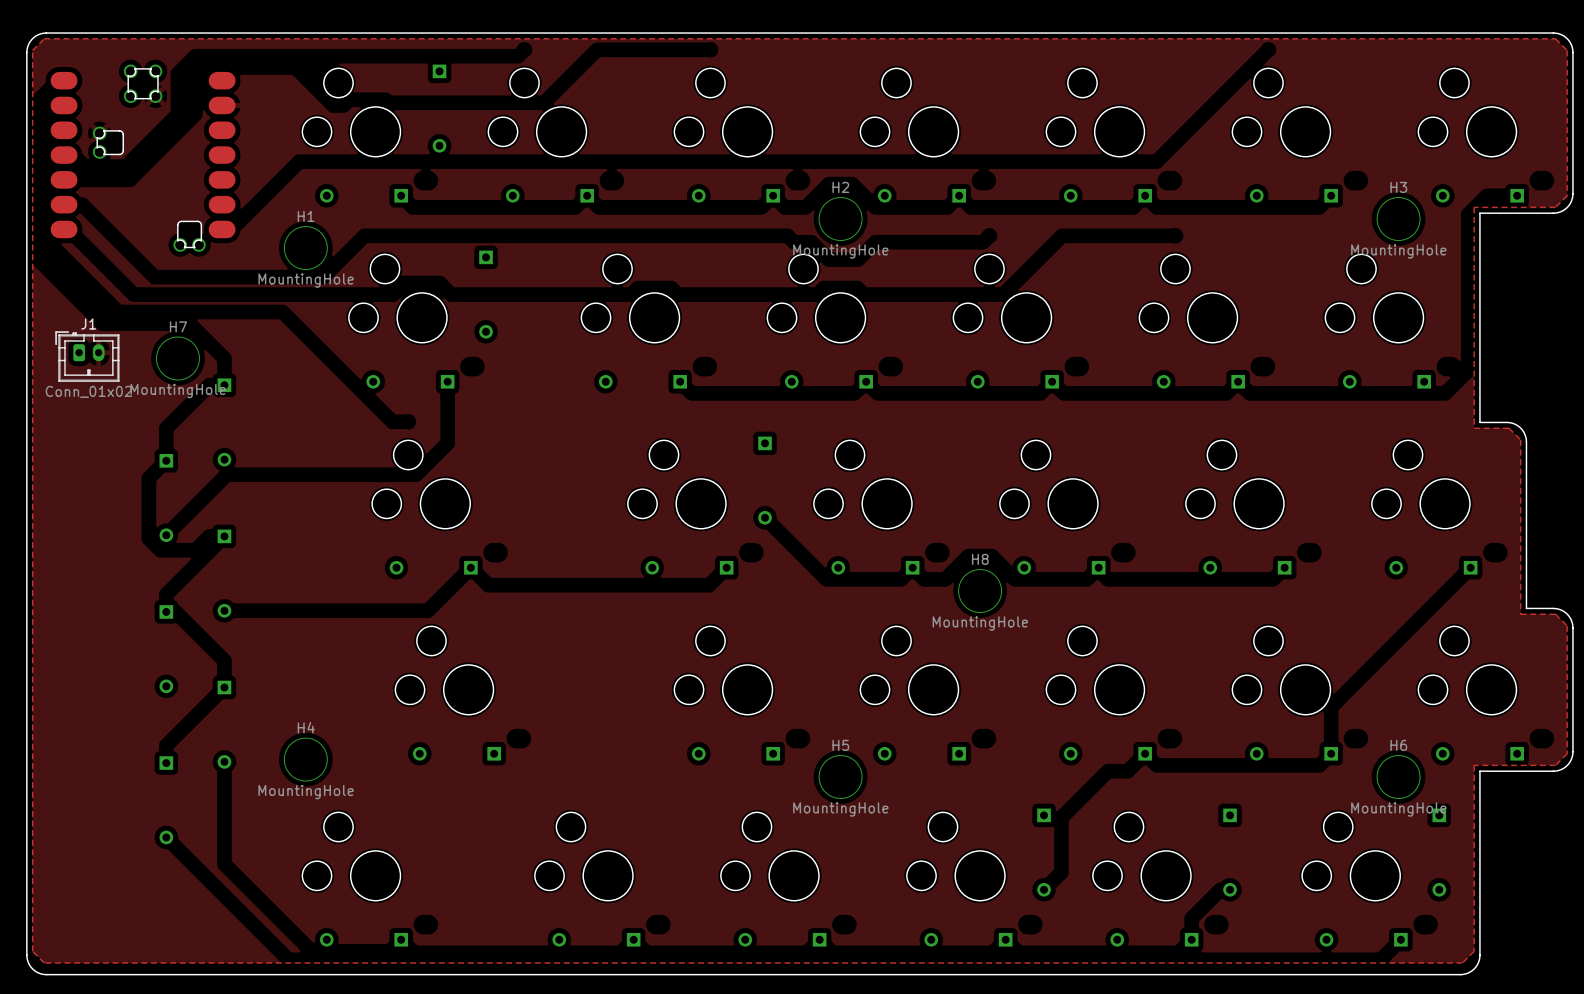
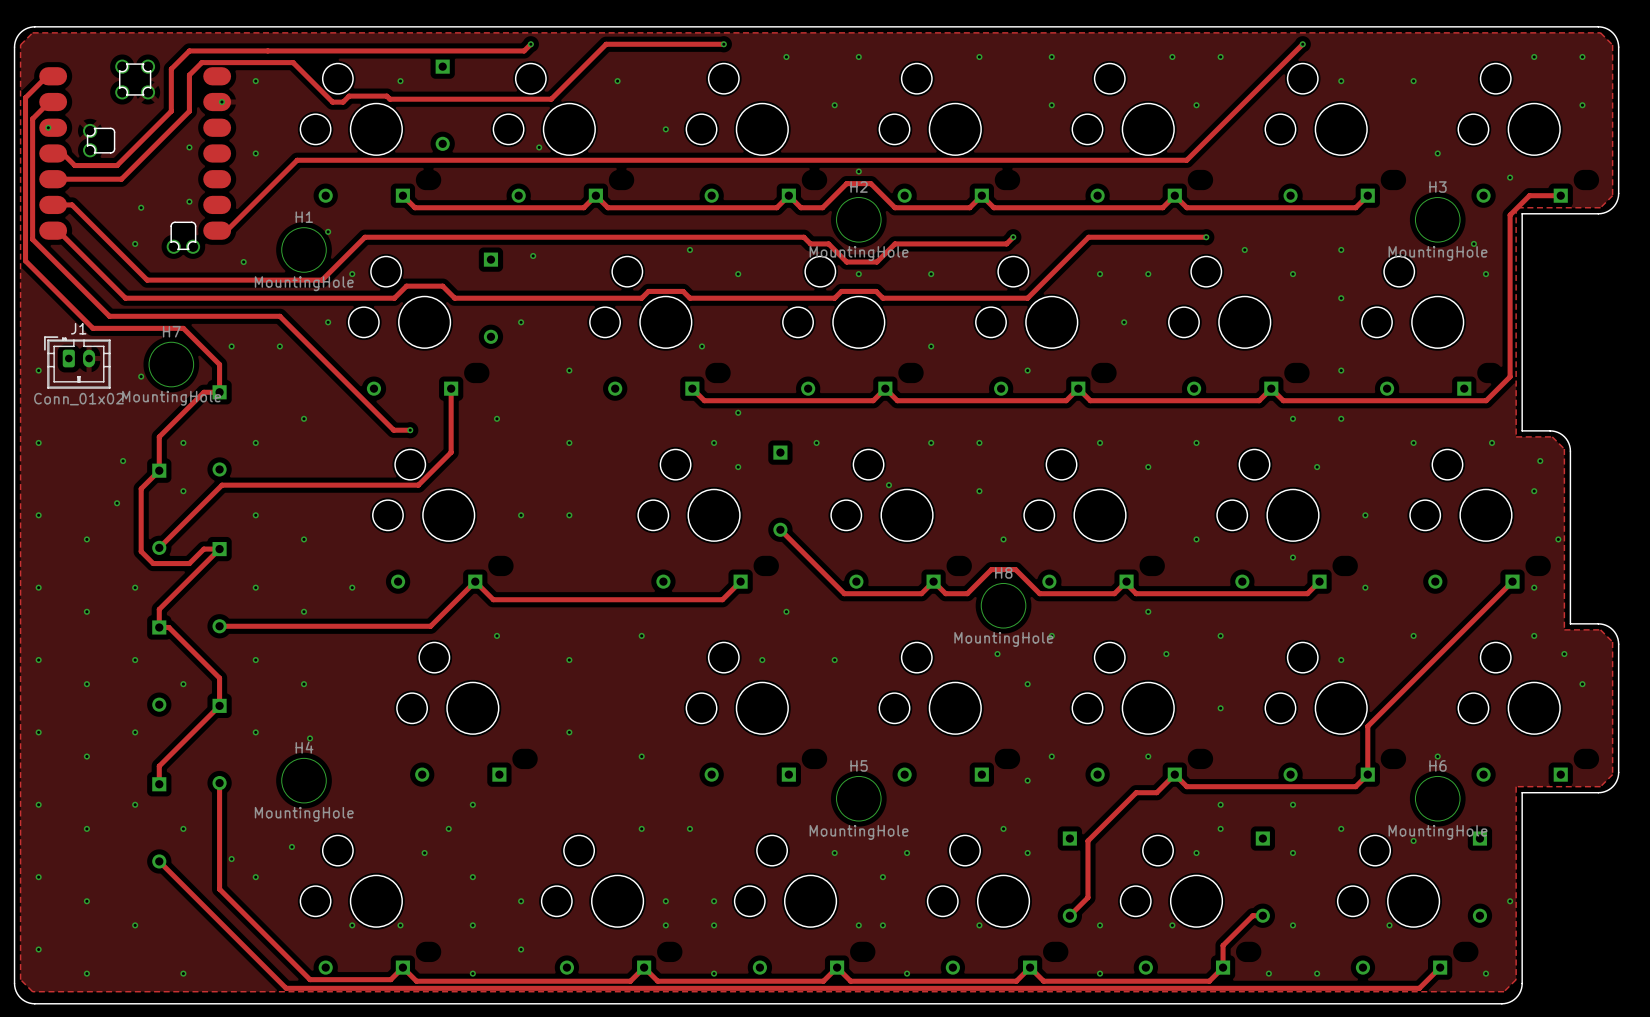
track: none -> (530, 44) (524, 50) (189, 50) (171, 69) (171, 111) (117, 165) (74, 165) (62, 153) (48, 153)
via: none -> (530, 44)
track: none -> (723, 44) (606, 44) (551, 99) (389, 99) (386, 96) (349, 96) (343, 102) (332, 102) (293, 62) (201, 62) (189, 75) (189, 111) (121, 179) (48, 179)
via: none -> (723, 44)
track: none -> (1302, 44) (1186, 160) (297, 160) (226, 230) (220, 230)
via: none -> (1302, 44)
via: none -> (786, 56)
via: none -> (858, 56)
via: none -> (979, 56)
via: none -> (1051, 56)
via: none -> (1172, 56)
via: none -> (1220, 56)
via: none -> (1534, 56)
via: none -> (1582, 56)
track: none -> (57, 76) (47, 76) (25, 97) (25, 260) (92, 328) (183, 328) (219, 364) (219, 392) (203, 392) (159, 436) (159, 470) (141, 488) (141, 551) (153, 563) (189, 563) (203, 549) (219, 549) (159, 609) (159, 627) (168, 627) (219, 678) (219, 705) (159, 766) (159, 784)
via: none -> (255, 81)
via: none -> (400, 81)
via: none -> (617, 81)
via: none -> (1341, 81)
via: none -> (1413, 81)
track: none -> (49, 102) (32, 118) (32, 239) (109, 316) (279, 316) (393, 430) (410, 430)
via: none -> (221, 102)
via: none -> (834, 105)
via: none -> (1051, 105)
via: none -> (1196, 105)
via: none -> (1582, 105)
via: none -> (48, 127)
via: none -> (665, 129)
via: none -> (189, 147)
via: none -> (539, 147)
via: none -> (255, 153)
via: none -> (1437, 153)
via: none -> (858, 171)
via: none -> (1510, 177)
track: none -> (402, 195) (414, 207) (583, 207) (595, 195) (607, 207) (776, 207) (788, 195) (800, 207) (822, 207) (846, 183) (870, 183) (894, 207) (969, 207) (981, 195) (993, 207) (1162, 207) (1174, 195) (1186, 207) (1355, 207) (1367, 195)
track: none -> (1560, 195) (1529, 195) (1510, 215) (1510, 376) (1486, 400) (1283, 400) (1271, 388) (1259, 400) (1090, 400) (1078, 388) (1066, 400) (897, 400) (885, 388) (873, 400) (704, 400) (692, 388)
via: none -> (189, 201)
track: none -> (57, 204) (72, 204) (147, 280) (322, 280) (364, 237) (803, 237) (810, 243) (828, 243) (846, 262) (876, 262) (894, 243) (1006, 243) (1013, 237)
via: none -> (141, 207)
track: none -> (57, 230) (125, 298) (394, 298) (406, 286) (442, 286) (454, 298) (641, 298) (648, 291) (683, 291) (689, 298) (834, 298) (841, 291) (876, 291) (882, 298) (1027, 298) (1088, 237) (1206, 237)
via: none -> (328, 231)
via: none -> (1013, 237)
via: none -> (1206, 237)
via: none -> (135, 243)
via: none -> (1473, 243)
via: none -> (689, 249)
via: none -> (1244, 249)
via: none -> (1341, 249)
via: none -> (533, 256)
via: none -> (243, 262)
via: none -> (352, 274)
via: none -> (738, 274)
via: none -> (858, 274)
via: none -> (931, 274)
via: none -> (1100, 274)
via: none -> (1148, 274)
via: none -> (1293, 274)
via: none -> (1485, 274)
via: none -> (1341, 298)
via: none -> (328, 322)
via: none -> (521, 322)
via: none -> (1124, 322)
via: none -> (231, 346)
via: none -> (279, 346)
via: none -> (702, 346)
via: none -> (931, 346)
via: none -> (38, 370)
via: none -> (569, 370)
via: none -> (1027, 370)
via: none -> (1341, 370)
via: none -> (141, 376)
track: none -> (451, 388) (451, 452) (418, 485) (221, 485) (159, 547)
via: none -> (738, 412)
via: none -> (304, 418)
via: none -> (496, 418)
via: none -> (1293, 418)
via: none -> (1341, 418)
via: none -> (410, 430)
via: none -> (38, 442)
via: none -> (183, 442)
via: none -> (255, 442)
via: none -> (569, 442)
via: none -> (714, 442)
via: none -> (816, 442)
via: none -> (931, 442)
via: none -> (979, 442)
via: none -> (1100, 442)
via: none -> (1196, 442)
via: none -> (1413, 442)
via: none -> (1492, 442)
via: none -> (123, 461)
via: none -> (1540, 461)
via: none -> (738, 467)
via: none -> (1148, 467)
via: none -> (1317, 467)
via: none -> (888, 485)
via: none -> (183, 491)
via: none -> (979, 491)
via: none -> (1534, 491)
via: none -> (117, 503)
via: none -> (38, 515)
via: none -> (255, 515)
via: none -> (521, 515)
via: none -> (569, 515)
via: none -> (1365, 515)
track: none -> (780, 529) (844, 593) (921, 593) (933, 581) (945, 593) (967, 593) (991, 569) (1015, 569) (1039, 593) (1114, 593) (1126, 581) (1126, 584) (1136, 593) (1307, 593) (1319, 581)
via: none -> (86, 539)
via: none -> (304, 539)
via: none -> (1003, 539)
via: none -> (1196, 539)
via: none -> (1558, 539)
via: none -> (1293, 557)
track: none -> (740, 581) (722, 599) (493, 599) (475, 581) (430, 626) (219, 626)
track: none -> (1510, 581) (1512, 581) (1367, 726) (1367, 774) (1355, 786) (1186, 786) (1174, 774) (1156, 792) (1136, 792) (1087, 840) (1087, 897) (1069, 915)
via: none -> (38, 587)
via: none -> (135, 587)
via: none -> (255, 587)
via: none -> (352, 587)
via: none -> (1365, 587)
via: none -> (1534, 587)
via: none -> (86, 611)
via: none -> (304, 611)
via: none -> (786, 611)
via: none -> (1148, 611)
via: none -> (496, 635)
via: none -> (641, 635)
via: none -> (1051, 635)
via: none -> (1220, 635)
via: none -> (1413, 635)
via: none -> (1534, 635)
via: none -> (997, 654)
via: none -> (1166, 654)
via: none -> (1564, 654)
via: none -> (38, 660)
via: none -> (135, 660)
via: none -> (255, 660)
via: none -> (569, 660)
via: none -> (762, 660)
via: none -> (834, 660)
via: none -> (1341, 660)
via: none -> (86, 684)
via: none -> (183, 684)
via: none -> (304, 684)
via: none -> (1027, 684)
via: none -> (1582, 684)
via: none -> (1220, 708)
via: none -> (38, 732)
via: none -> (135, 732)
via: none -> (255, 732)
via: none -> (569, 732)
via: none -> (310, 738)
via: none -> (86, 756)
via: none -> (641, 756)
via: none -> (1051, 756)
via: none -> (1148, 756)
via: none -> (1437, 756)
via: none -> (1027, 780)
track: none -> (219, 783) (219, 889) (310, 979) (390, 979) (402, 967) (416, 981) (630, 981) (644, 967) (657, 981) (823, 981) (837, 967) (850, 981) (1016, 981) (1030, 967)
via: none -> (38, 804)
via: none -> (135, 804)
via: none -> (472, 804)
via: none -> (1220, 804)
via: none -> (1293, 804)
via: none -> (86, 828)
via: none -> (183, 828)
via: none -> (448, 828)
via: none -> (641, 828)
via: none -> (689, 828)
via: none -> (1003, 828)
via: none -> (1220, 828)
via: none -> (1341, 828)
via: none -> (1413, 840)
via: none -> (291, 846)
via: none -> (424, 853)
via: none -> (834, 853)
via: none -> (907, 853)
via: none -> (1027, 853)
via: none -> (1196, 853)
via: none -> (1293, 853)
via: none -> (231, 859)
track: none -> (159, 861) (286, 988) (1419, 988) (1440, 967)
via: none -> (38, 877)
via: none -> (255, 877)
via: none -> (472, 877)
via: none -> (882, 877)
via: none -> (86, 901)
via: none -> (521, 901)
via: none -> (665, 901)
via: none -> (714, 901)
via: none -> (1510, 901)
track: none -> (1262, 915) (1252, 915) (1223, 945) (1223, 967) (1209, 981) (1043, 981) (1030, 967)
via: none -> (135, 925)
via: none -> (352, 925)
via: none -> (400, 925)
via: none -> (472, 925)
via: none -> (665, 925)
via: none -> (714, 925)
via: none -> (858, 925)
via: none -> (882, 925)
via: none -> (979, 925)
via: none -> (1100, 925)
via: none -> (1172, 925)
via: none -> (1293, 925)
via: none -> (1389, 925)
via: none -> (38, 949)
via: none -> (521, 949)
via: none -> (86, 973)
via: none -> (183, 973)
via: none -> (472, 973)
via: none -> (714, 973)
via: none -> (907, 973)
via: none -> (1100, 973)
via: none -> (1268, 973)
via: none -> (1317, 973)
via: none -> (1485, 973)

